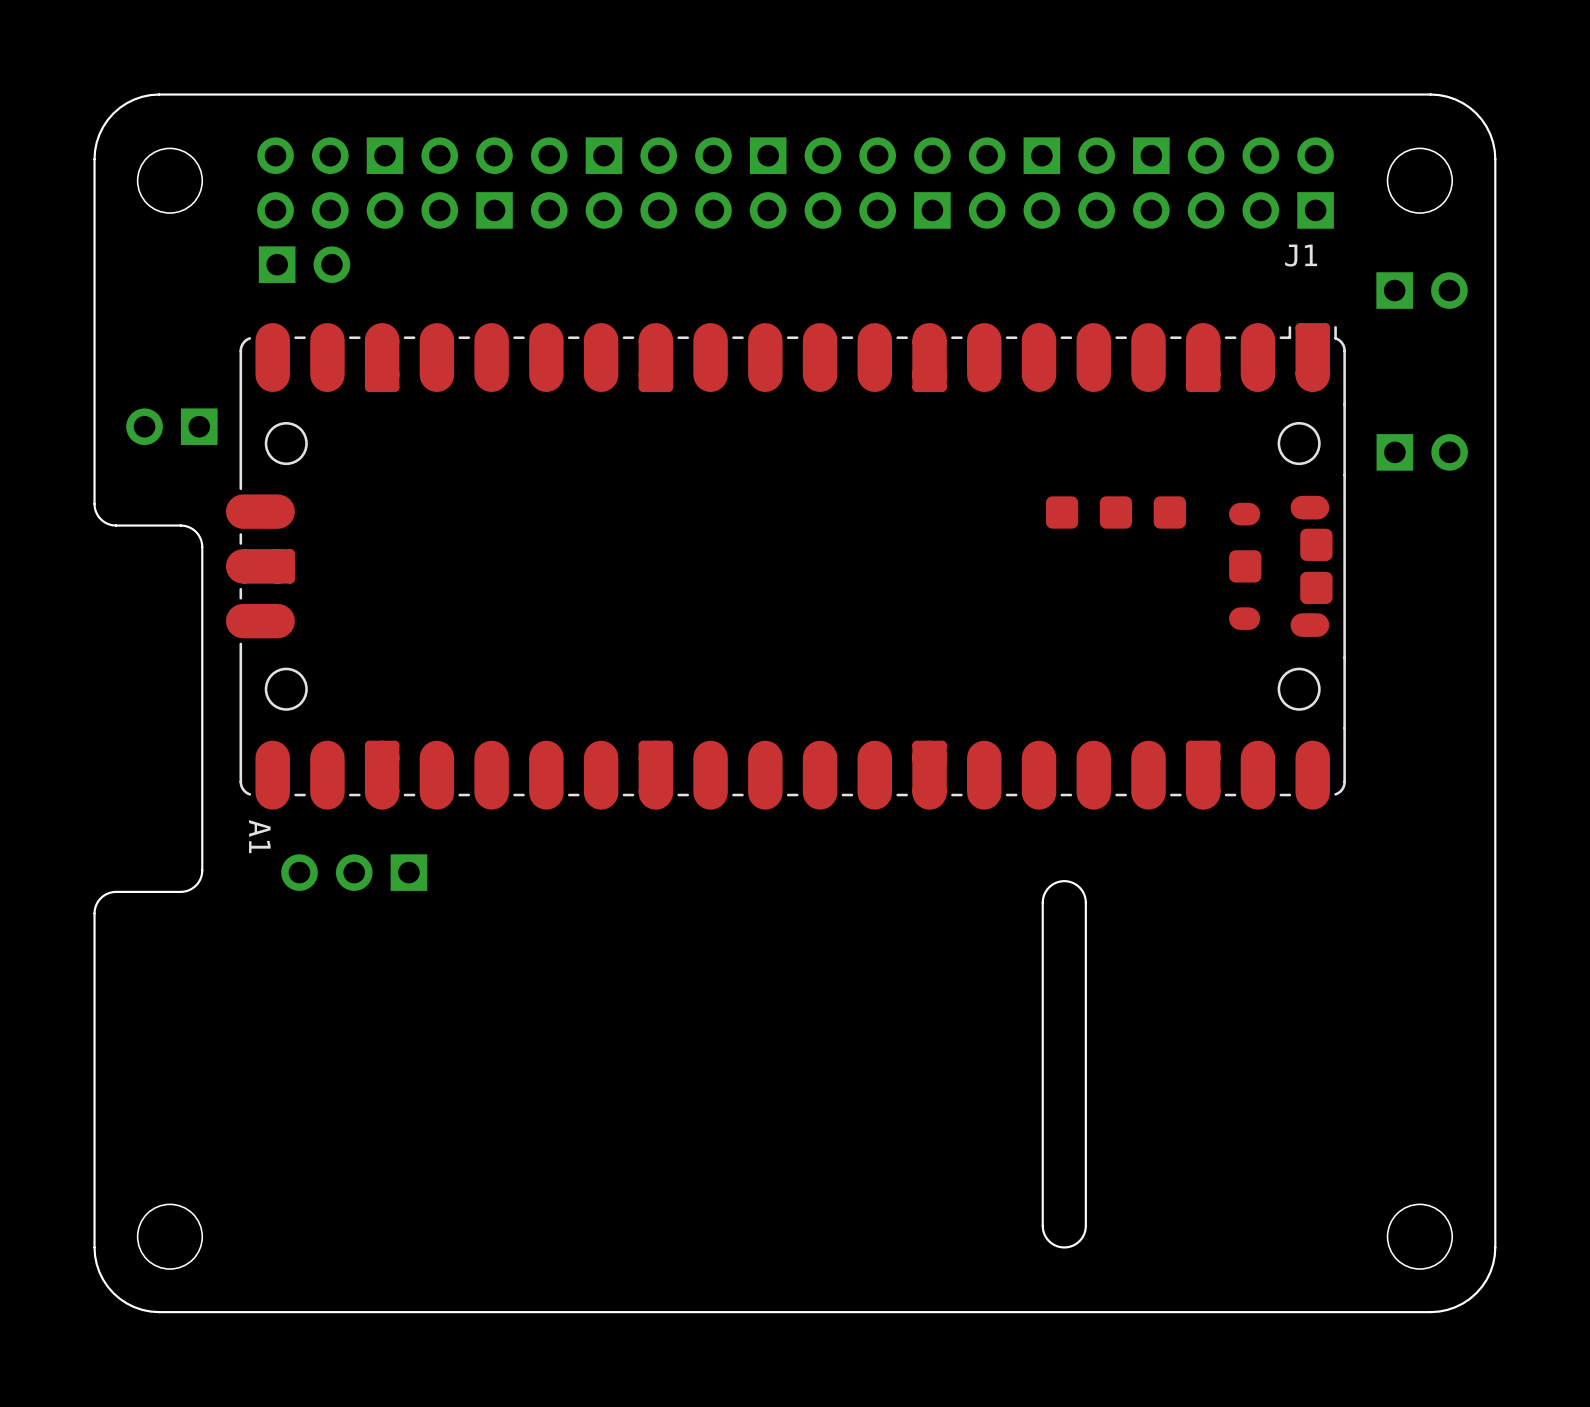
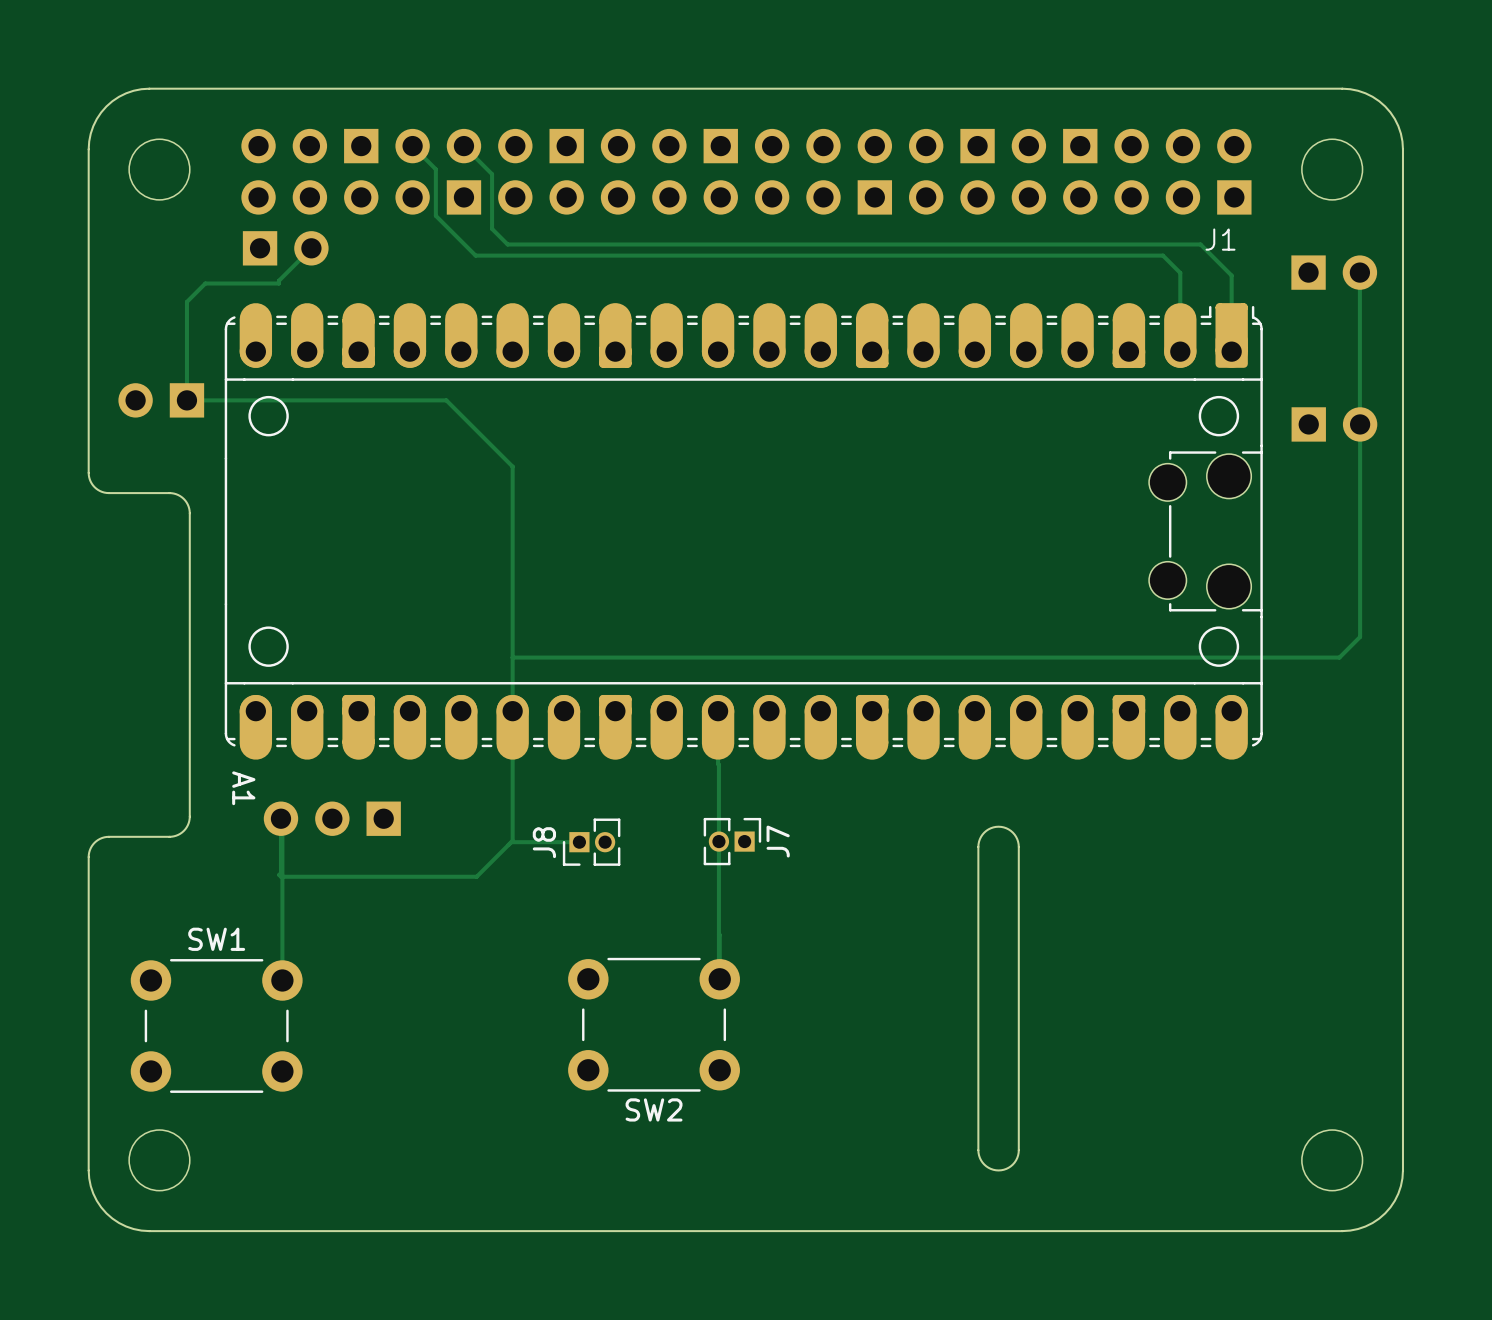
track: none -> (412, 146) (435, 169) (435, 215) (475, 255) (1162, 255) (1180, 272) (1180, 351)
track: none -> (463, 146) (492, 174) (492, 228) (507, 244) (1200, 244) (1231, 275) (1231, 351)
track: none -> (311, 248) (278, 280) (278, 283) (205, 283) (186, 301) (186, 400) (446, 400) (512, 466) (512, 840) (476, 876) (280, 876) (279, 874) (280, 873) (280, 818) (282, 820) (282, 980)
track: none -> (1359, 272) (1359, 424)
A1 footprint: [225, 323, 1346, 810] -> [224, 303, 1263, 760]
track: none -> (1360, 424) (1360, 636) (1339, 657) (512, 657)
track: none -> (718, 711) (718, 968) (712, 975)
J7: none -> (732, 841)
track: none -> (511, 842) (579, 842)
J8: none -> (591, 842)
SW2: none -> (654, 1024)
SW1: none -> (216, 1025)

